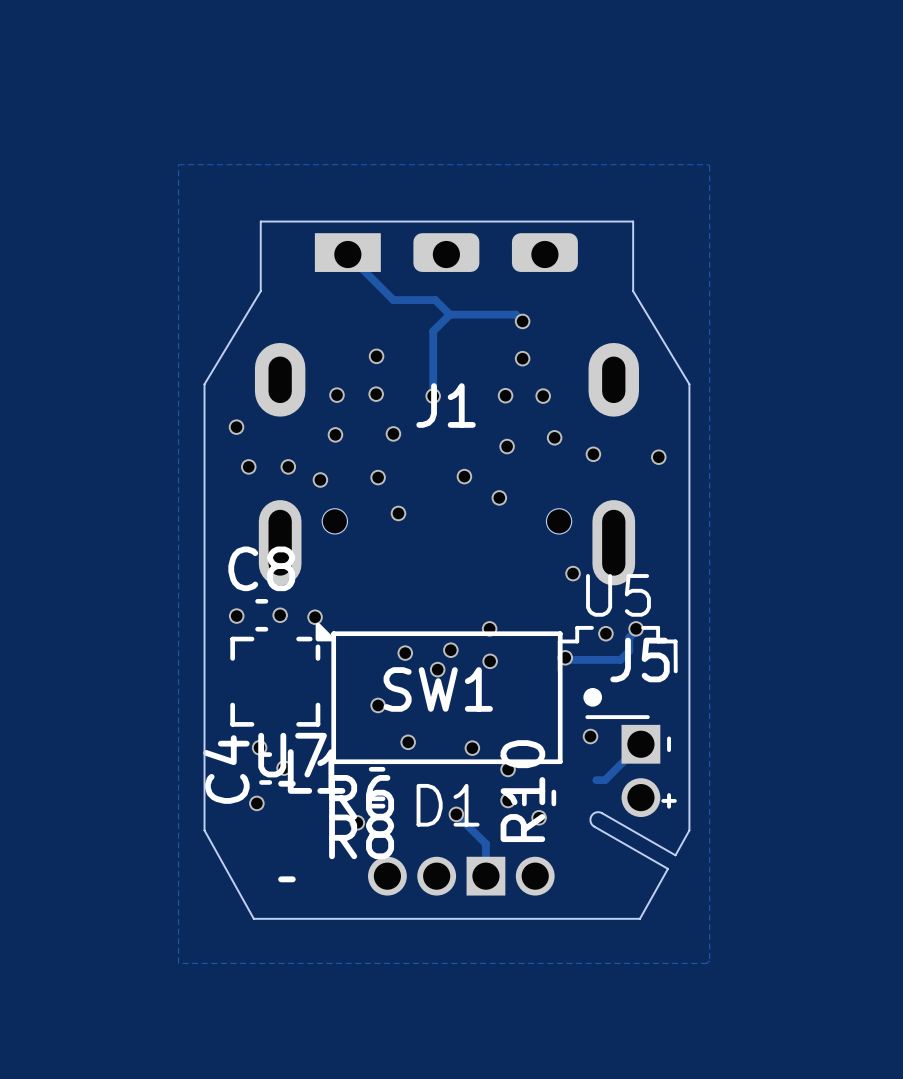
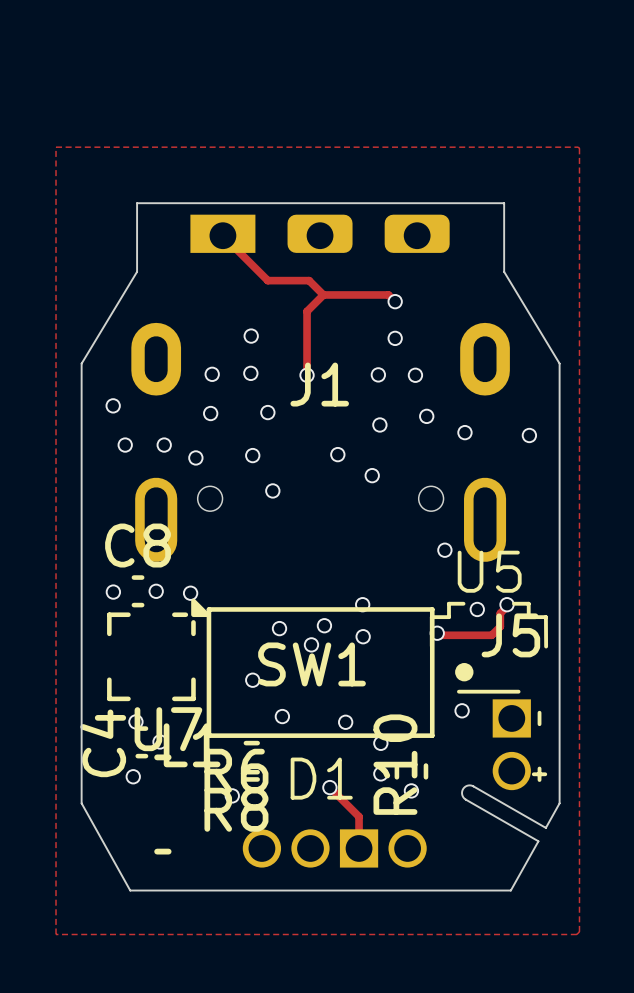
track: (640, 744) (605, 780) (596, 780) -> none

